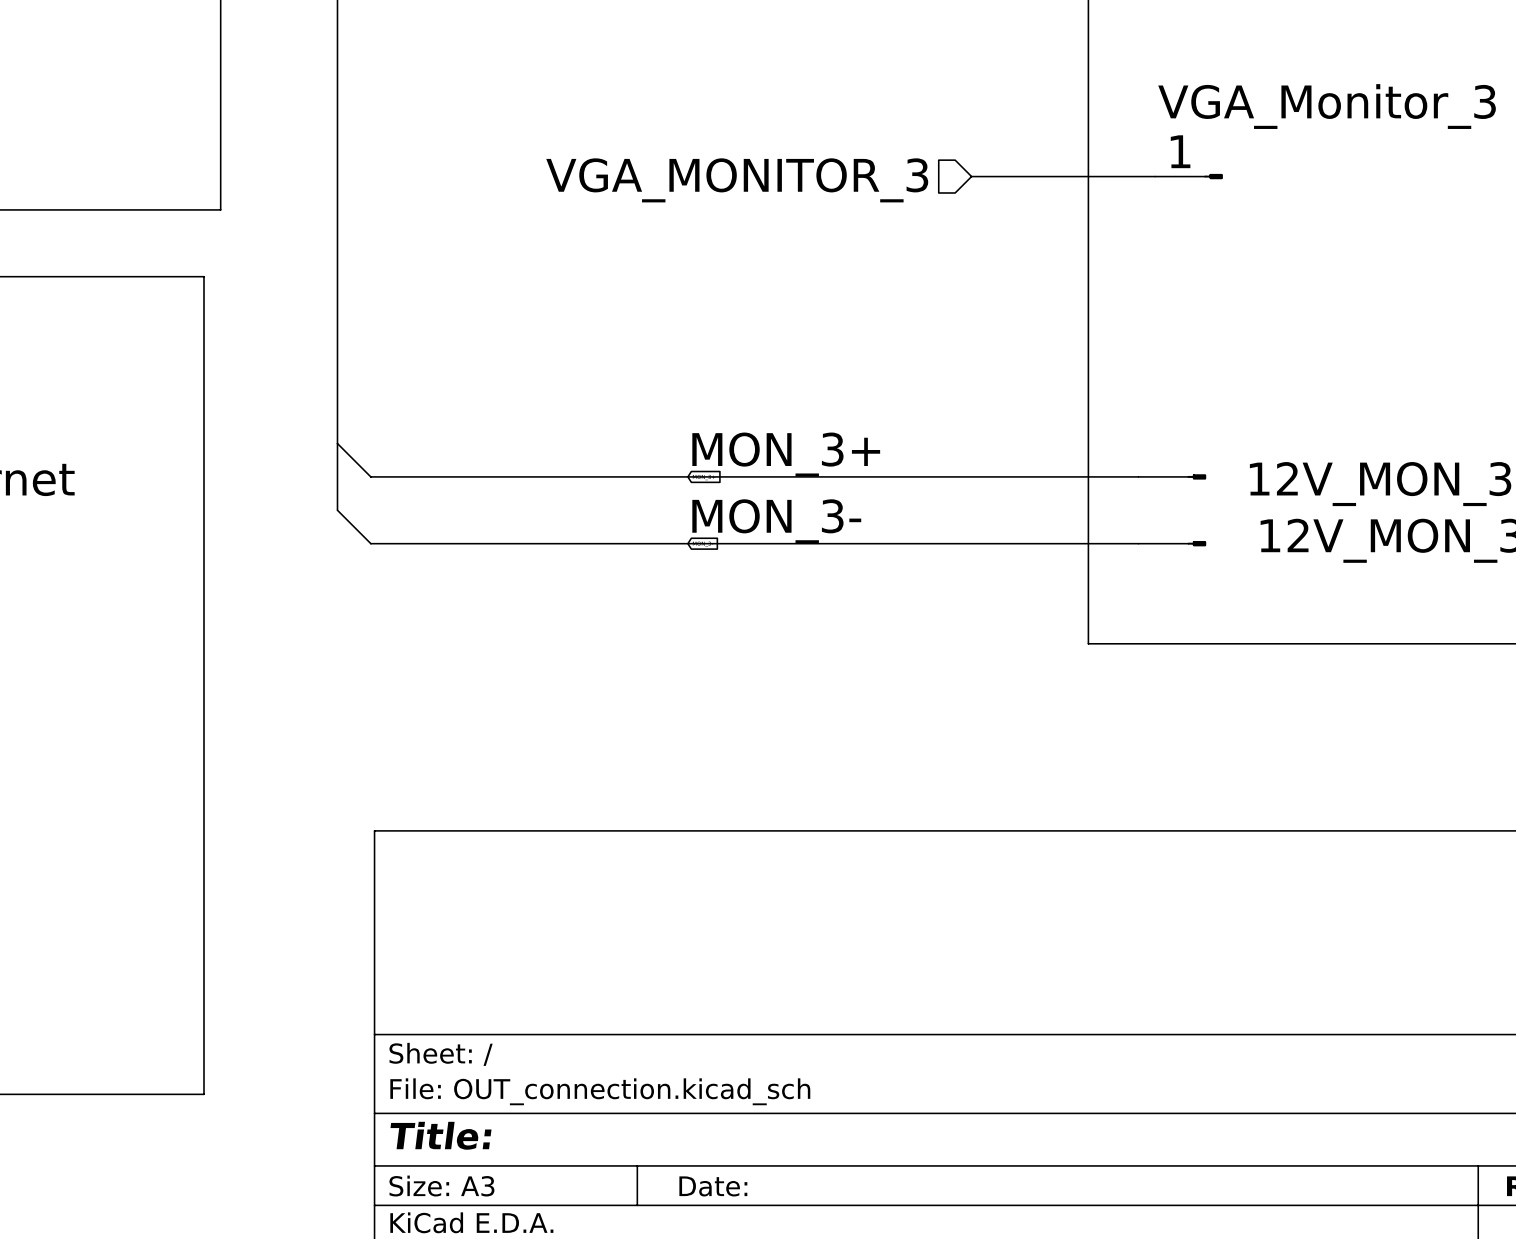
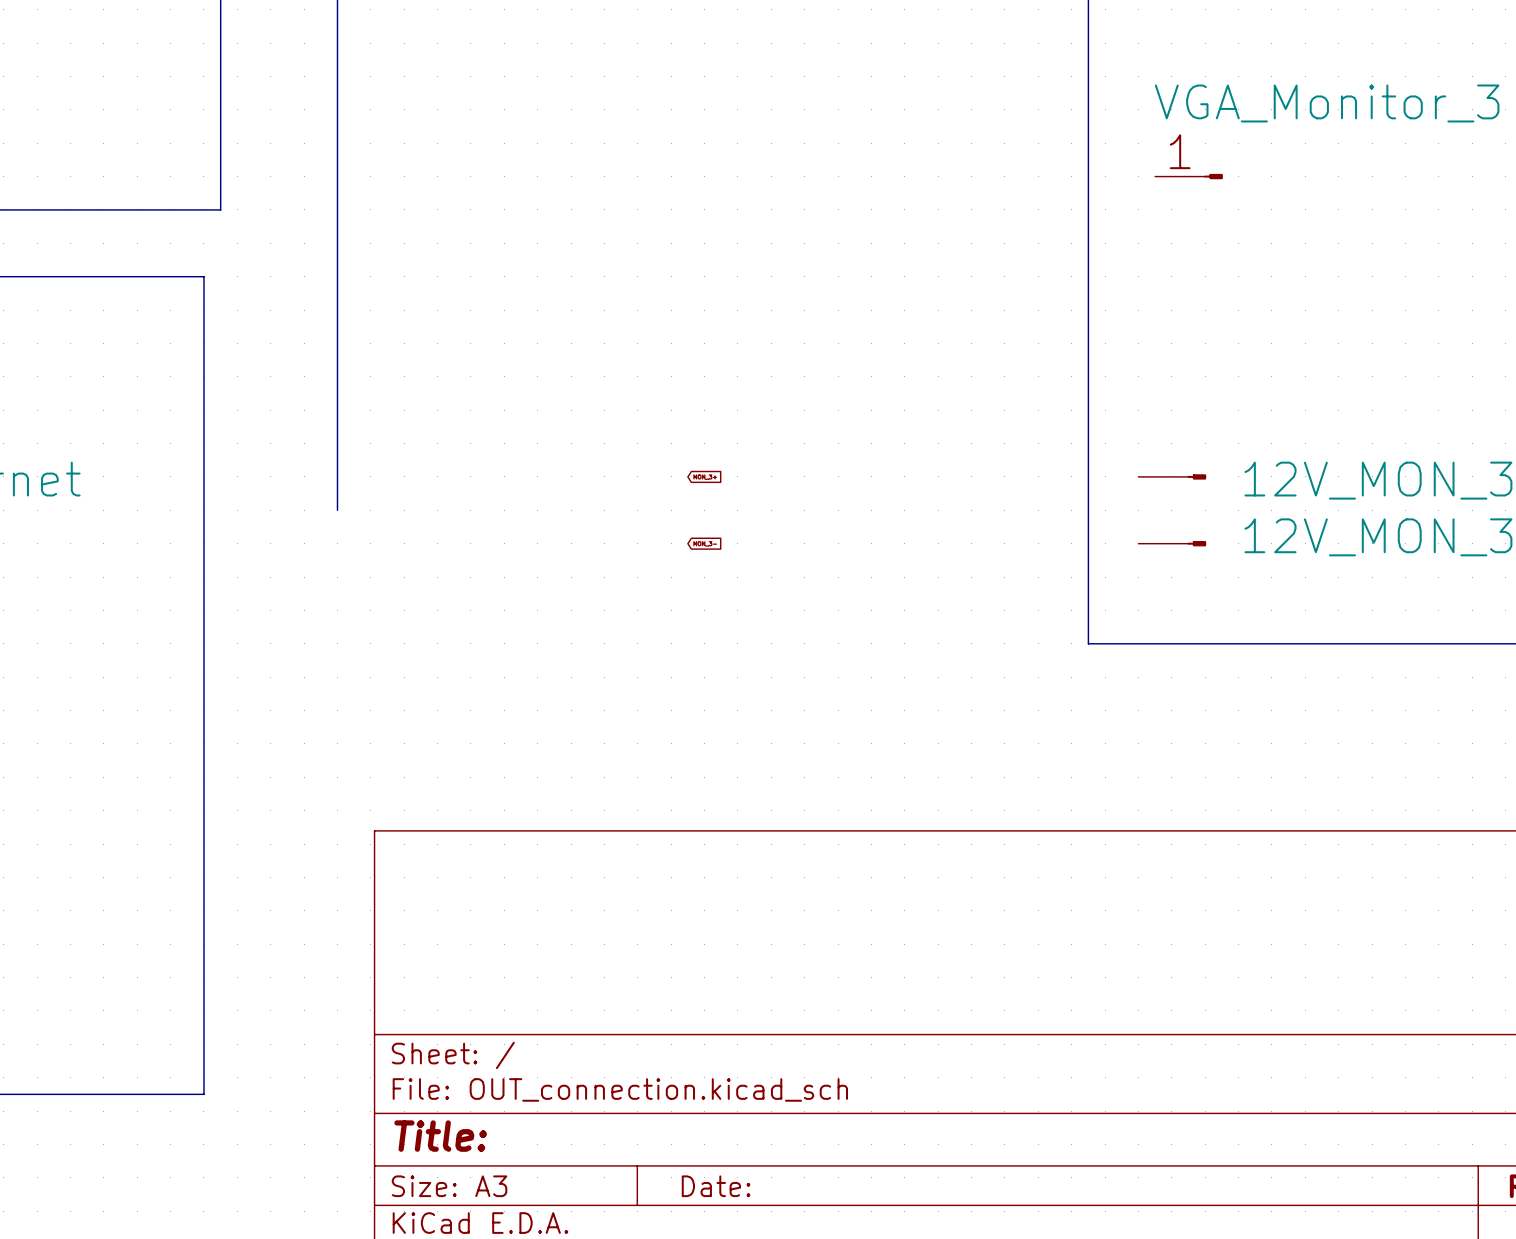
wire: (971, 176) (1155, 176) -> none
hierarchical label: VGA_MONITOR_3 (737, 180) -> none
wire: (337, 443) (370, 476) (1138, 476) -> none
label: MON_3+ (786, 454) -> none
wire: (337, 510) (370, 543) (1138, 543) -> none
label: MON_3- (776, 521) -> none

